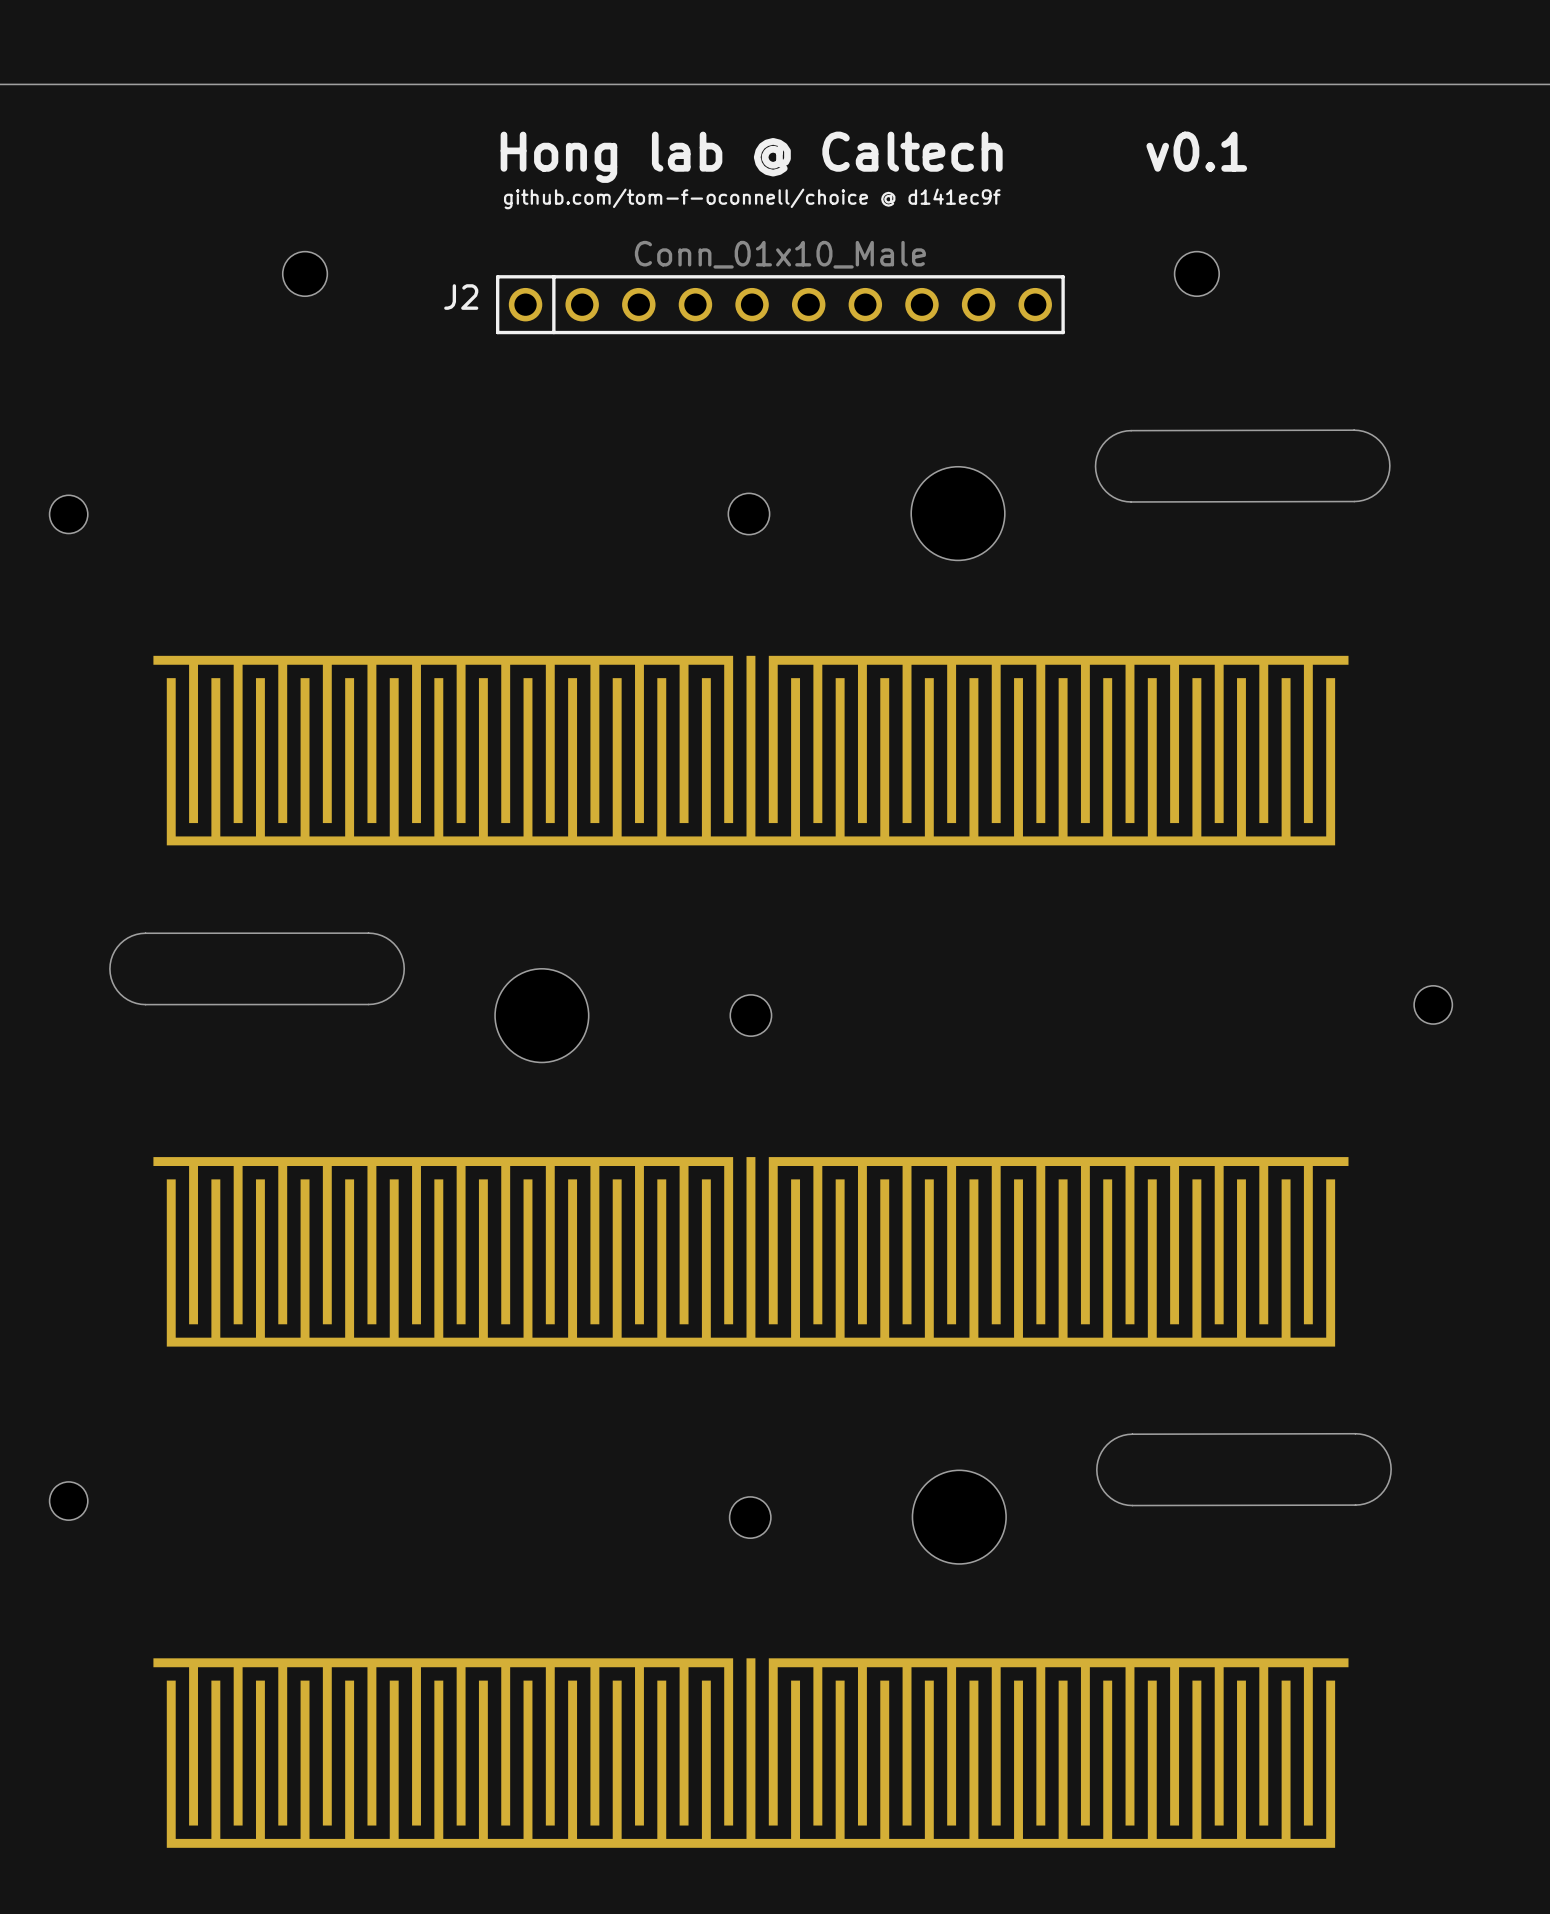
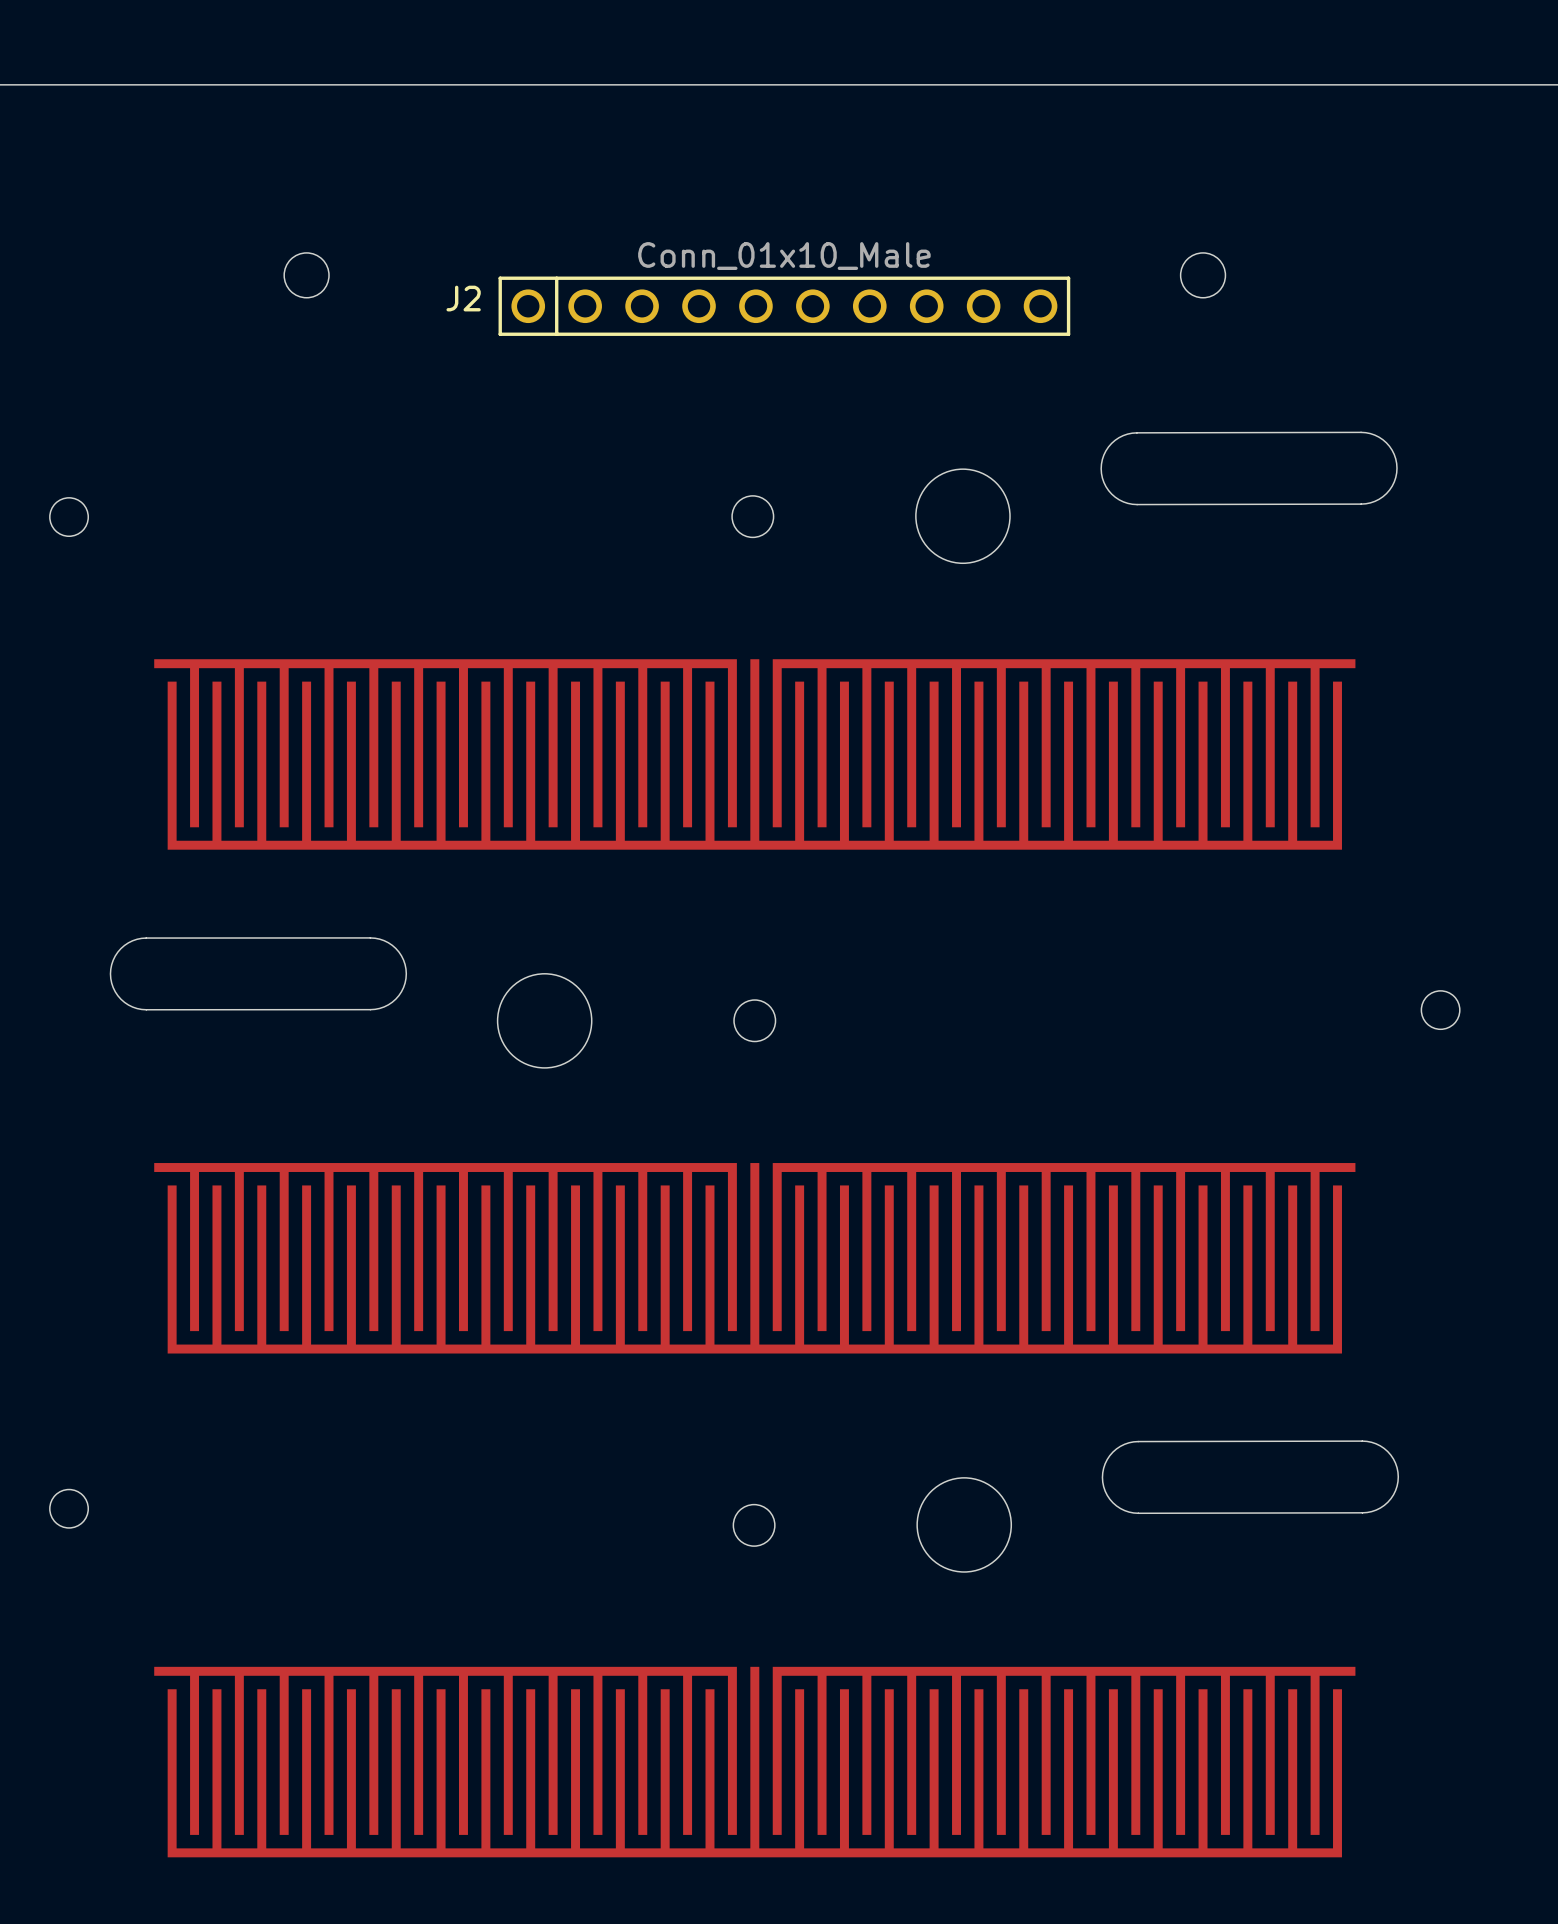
text: v0.1 (1196, 151) -> none
text: Hong lab @ Caltech (751, 157) -> none
text: github.com/tom-f-oconnell/choice @ d141ec9f (752, 198) -> none

